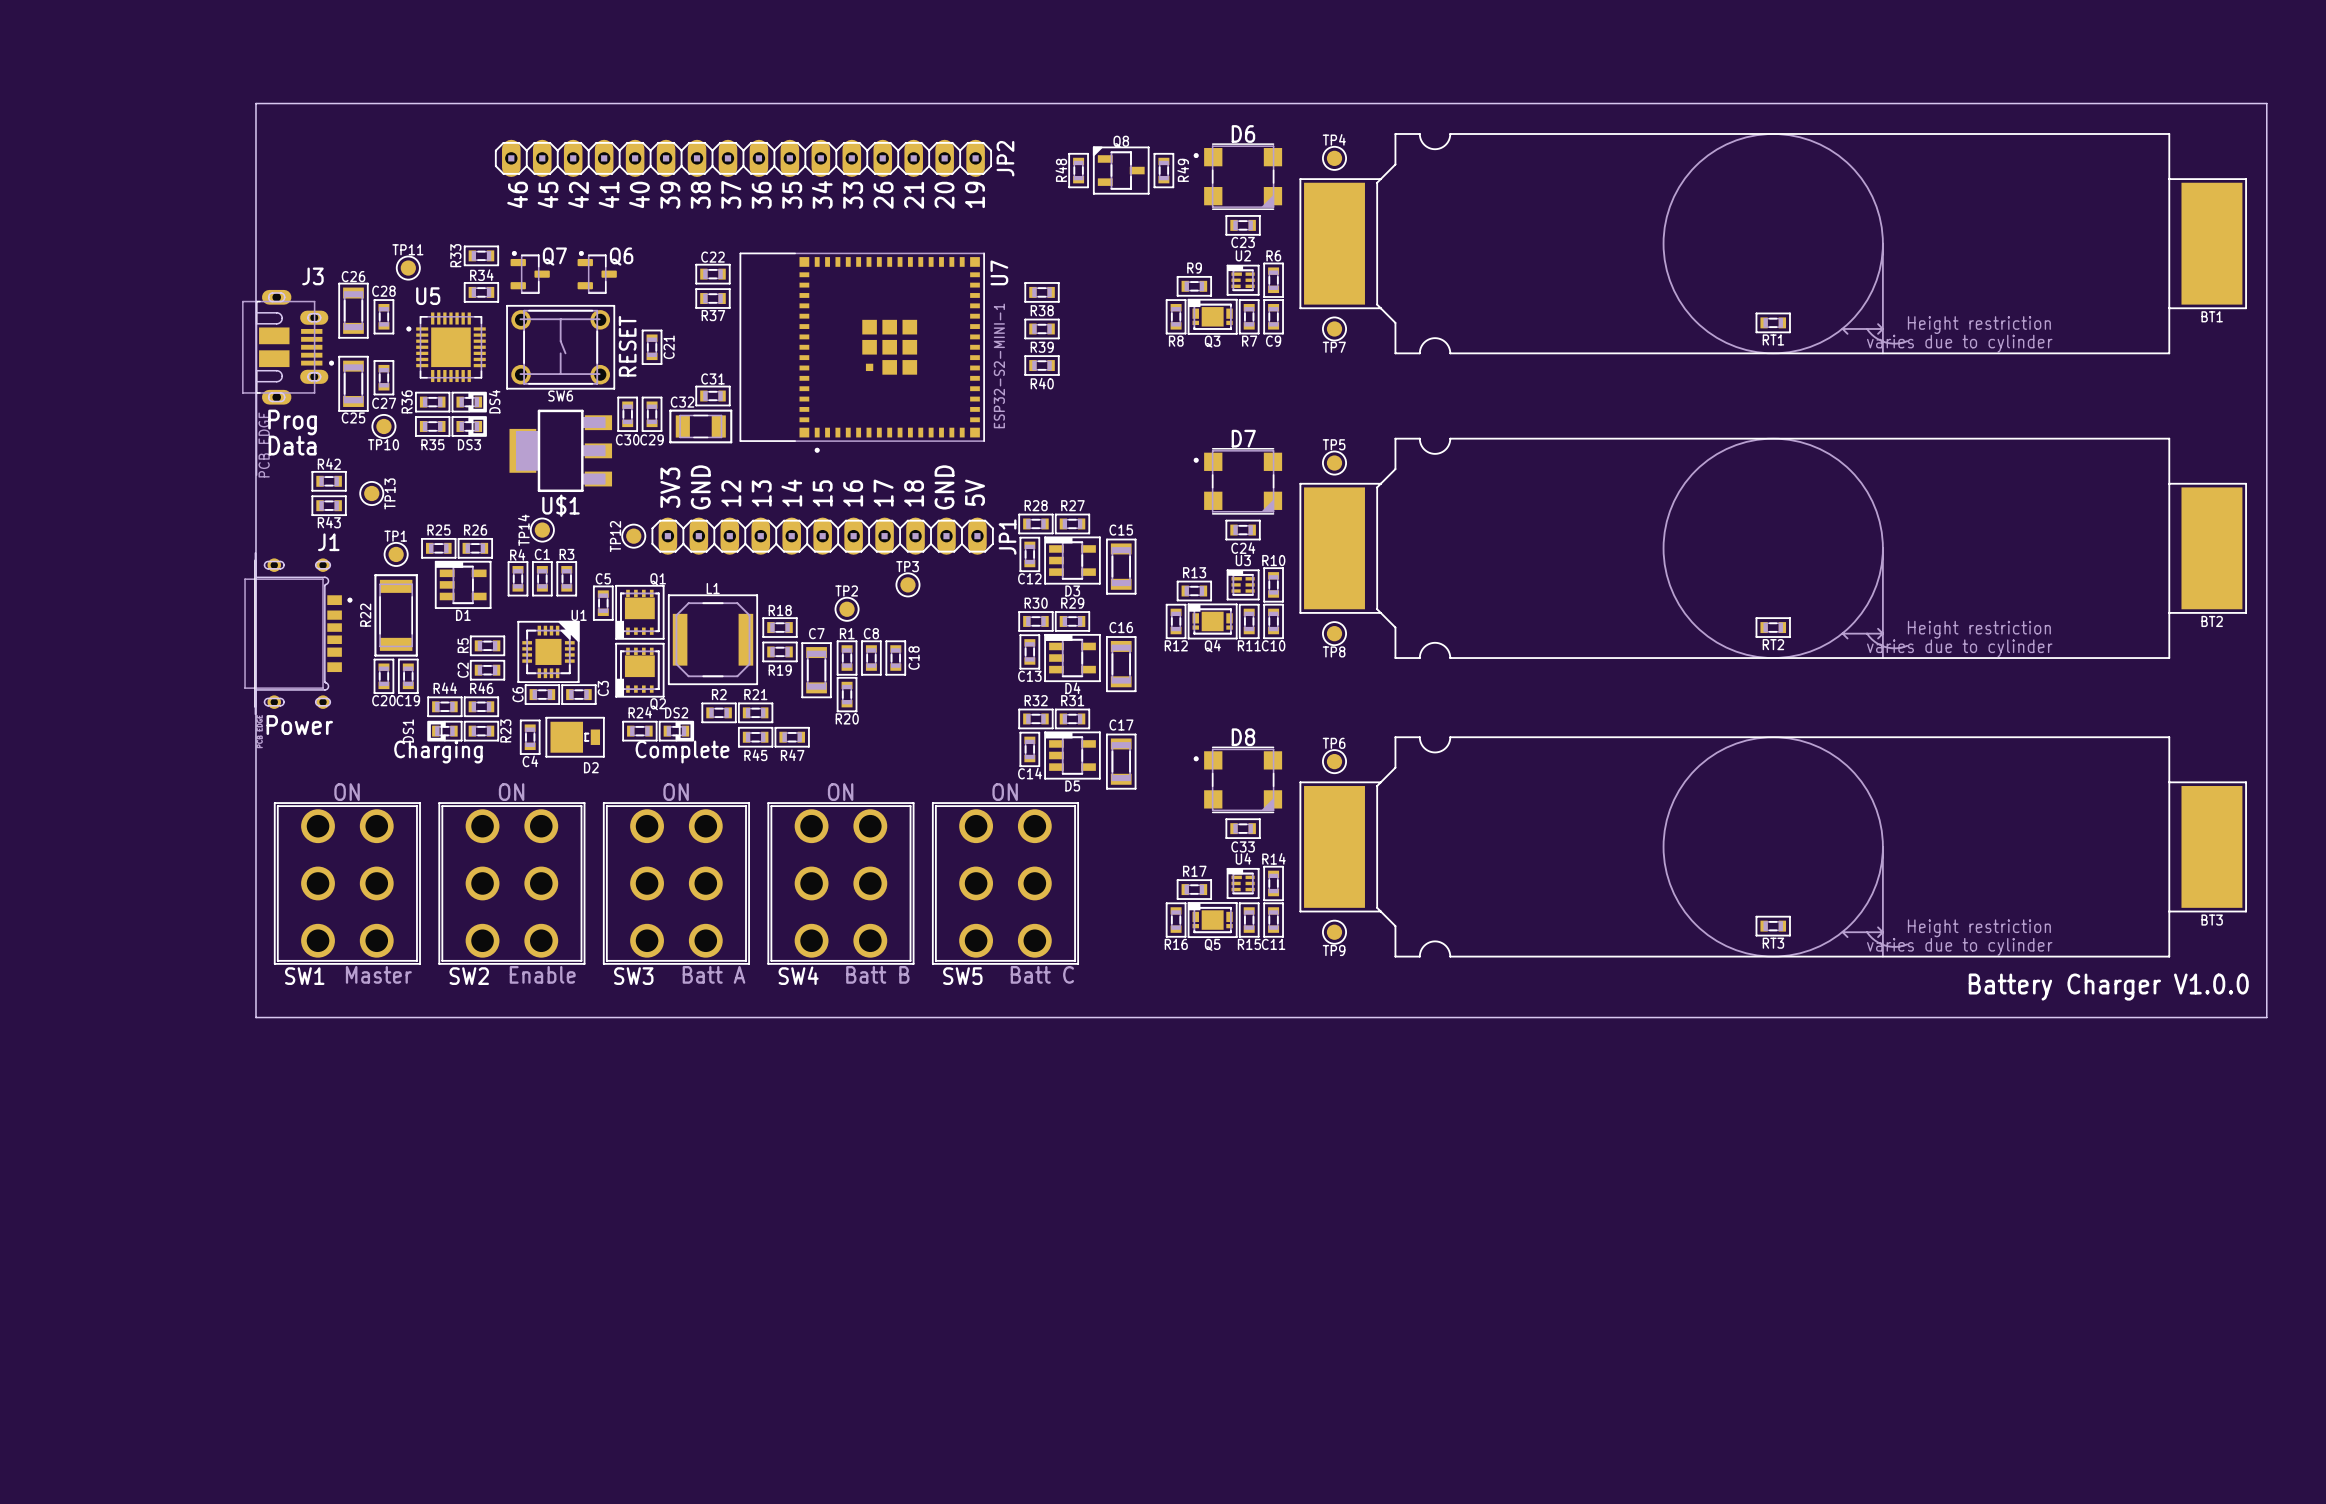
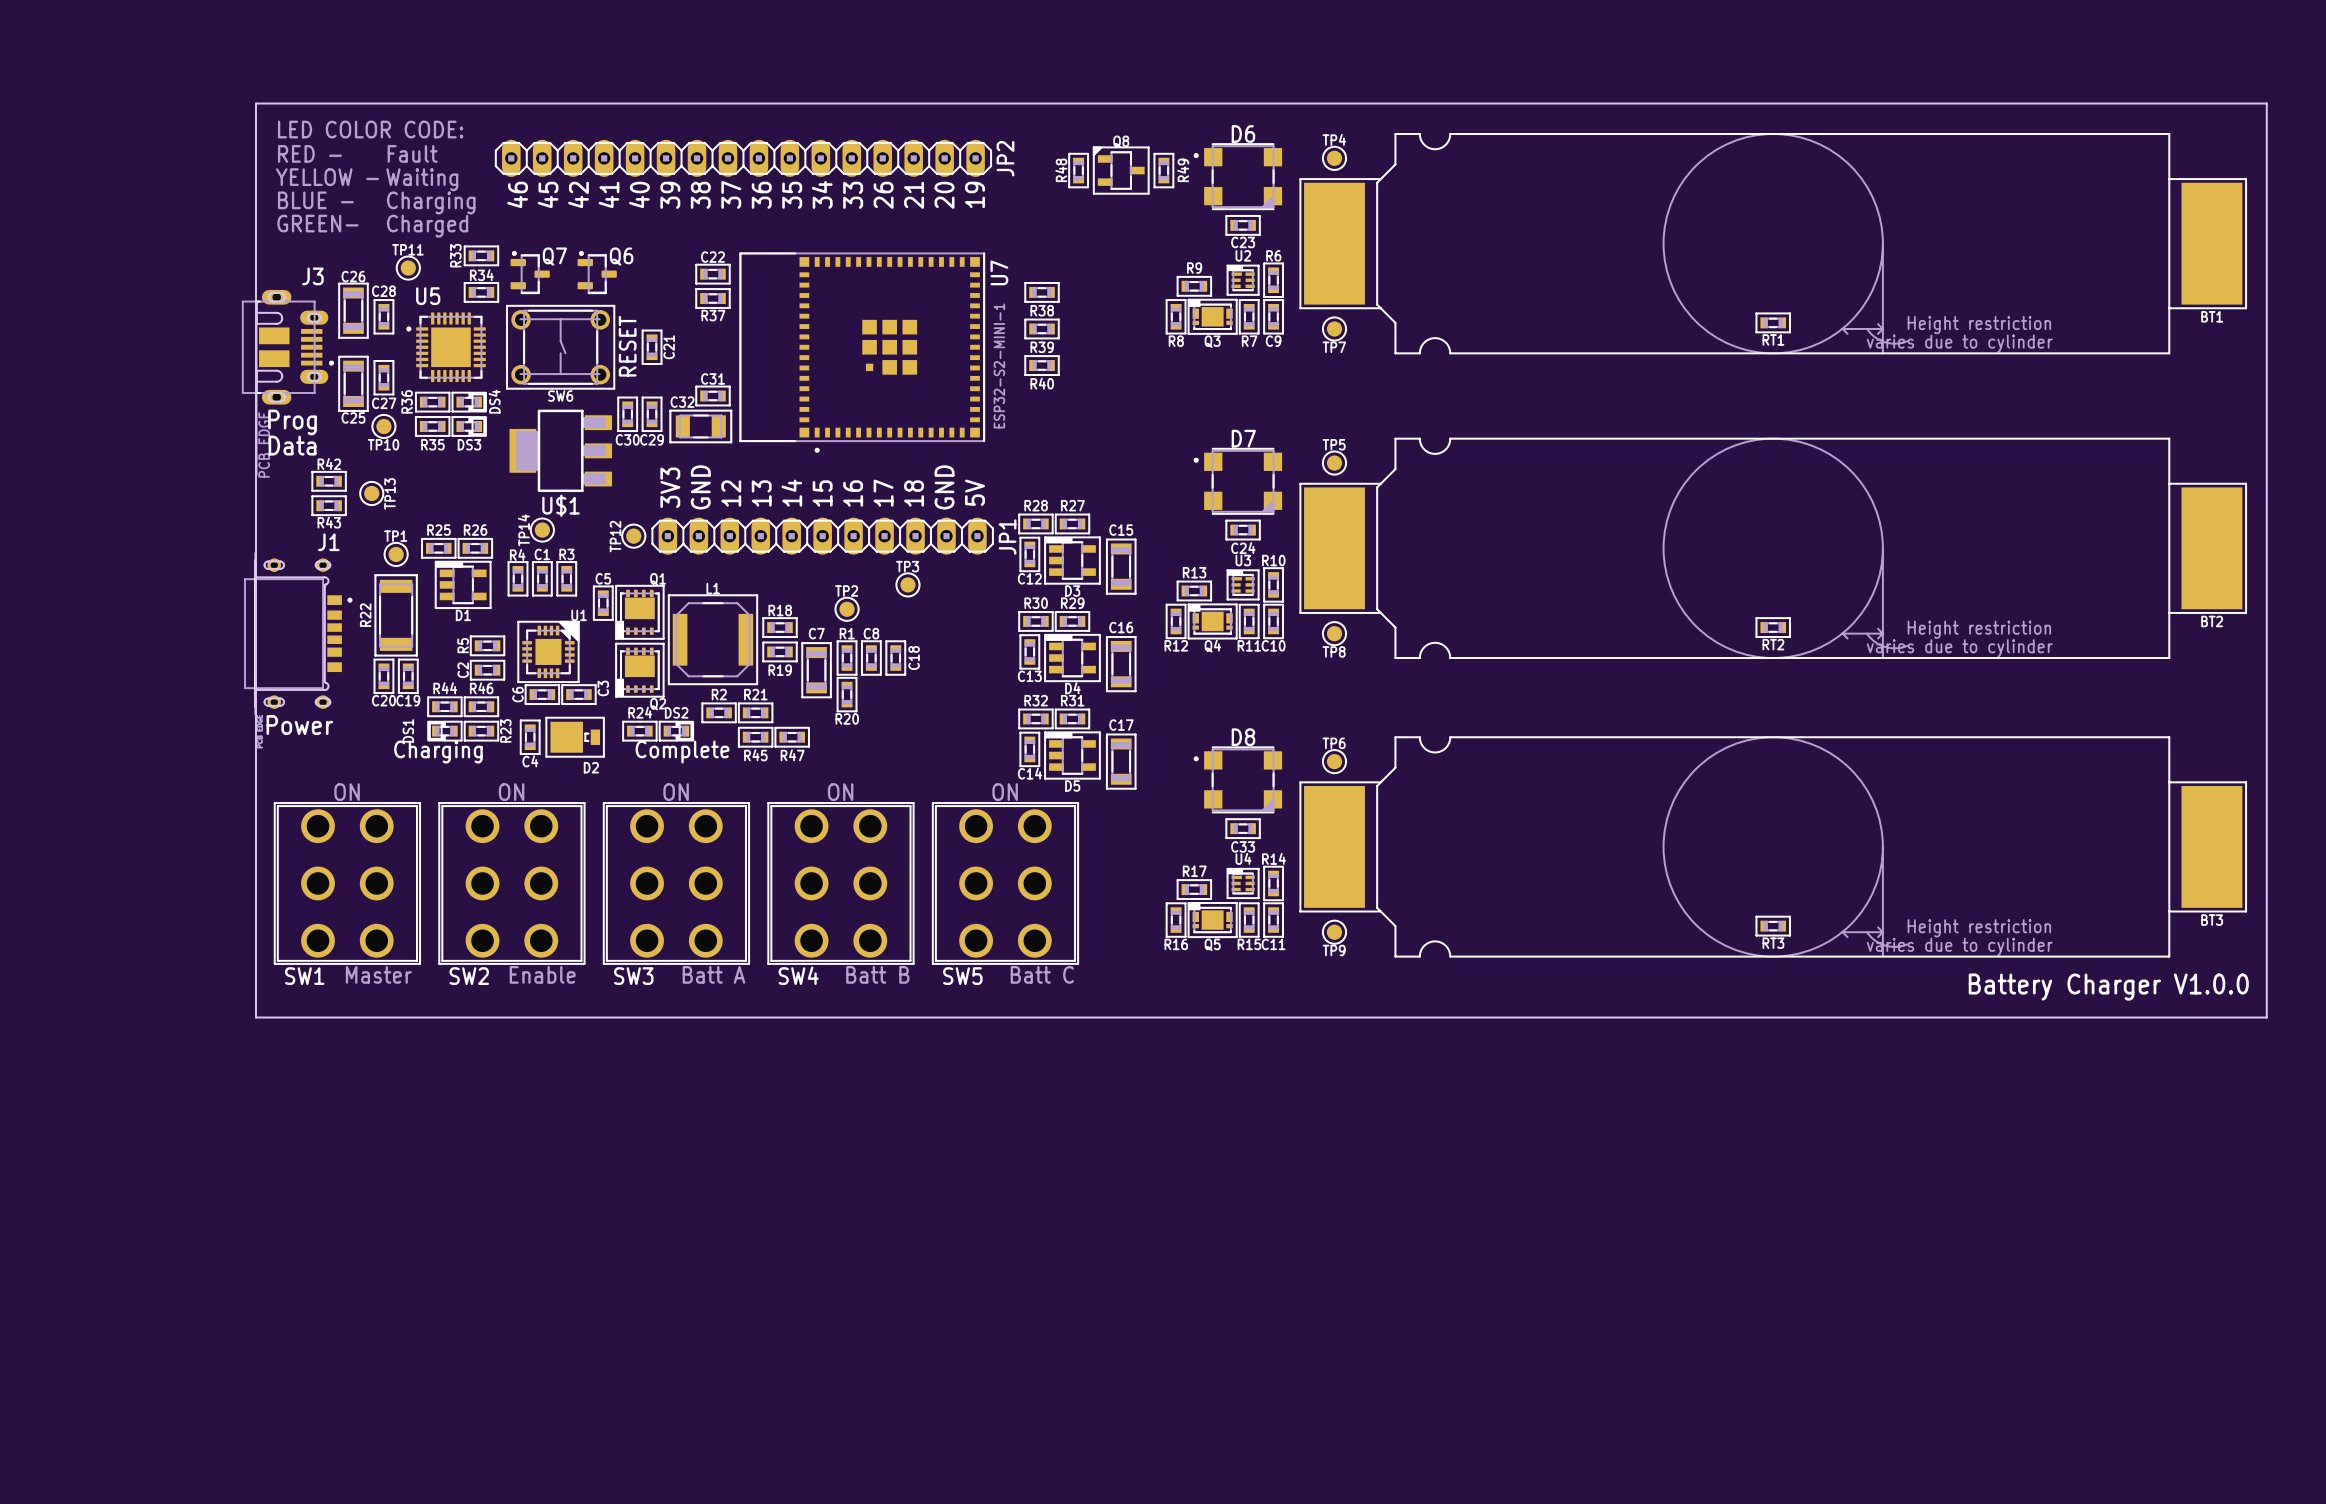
text: none -> LED COLOR CODE: (370, 129)
text: none -> RED - (309, 153)
text: none -> Fault (412, 153)
text: none -> YELLOW - (327, 177)
text: none -> Waiting (422, 179)
text: none -> BLUE - (315, 200)
text: none -> Charging (431, 202)
text: none -> GREEN- (317, 223)
text: none -> Charged (427, 226)

